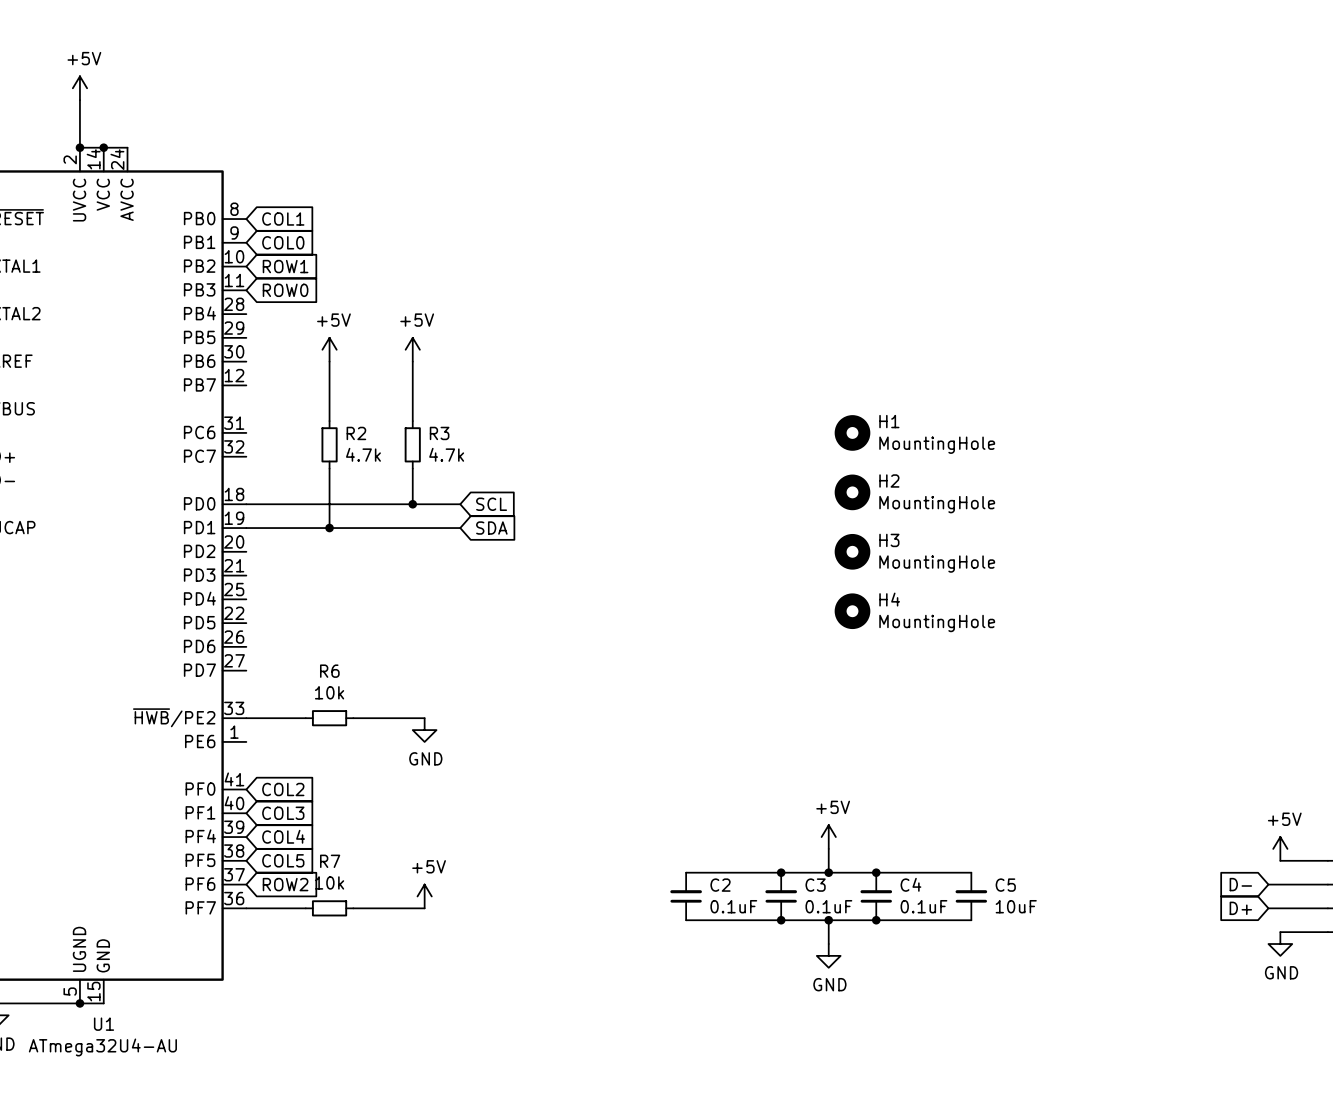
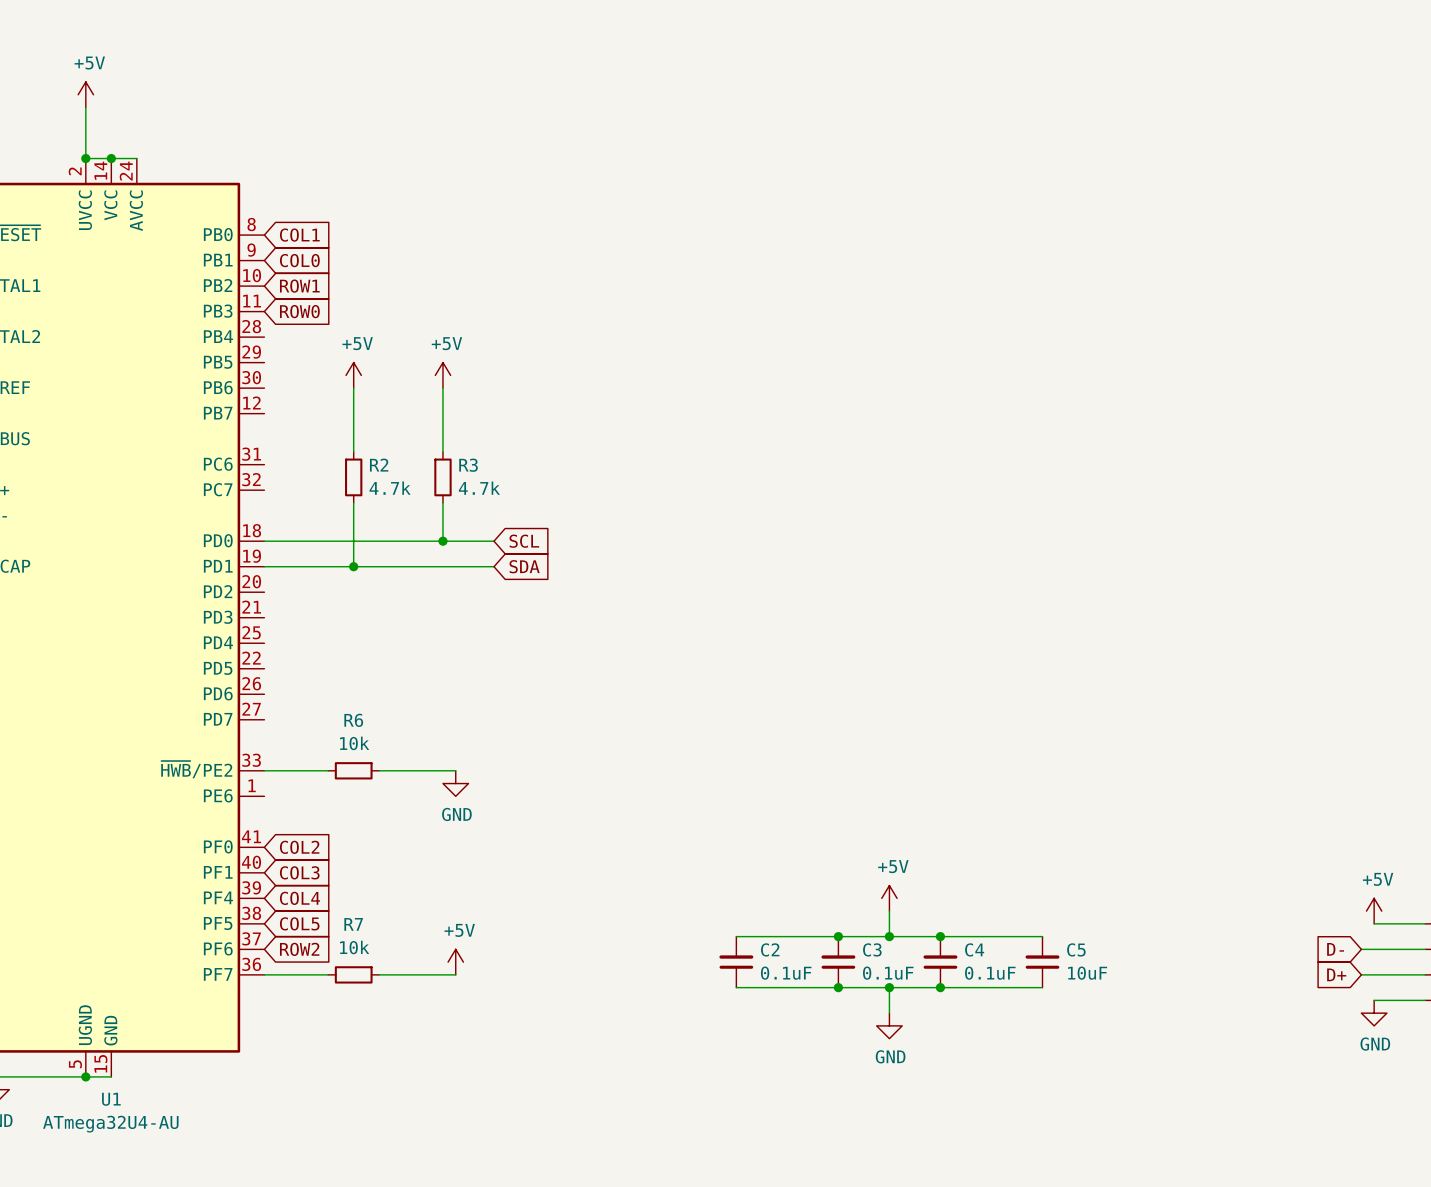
H1: MountingHole (852, 432) -> none
H2: MountingHole (852, 492) -> none
H3: MountingHole (852, 551) -> none
H4: MountingHole (852, 611) -> none

